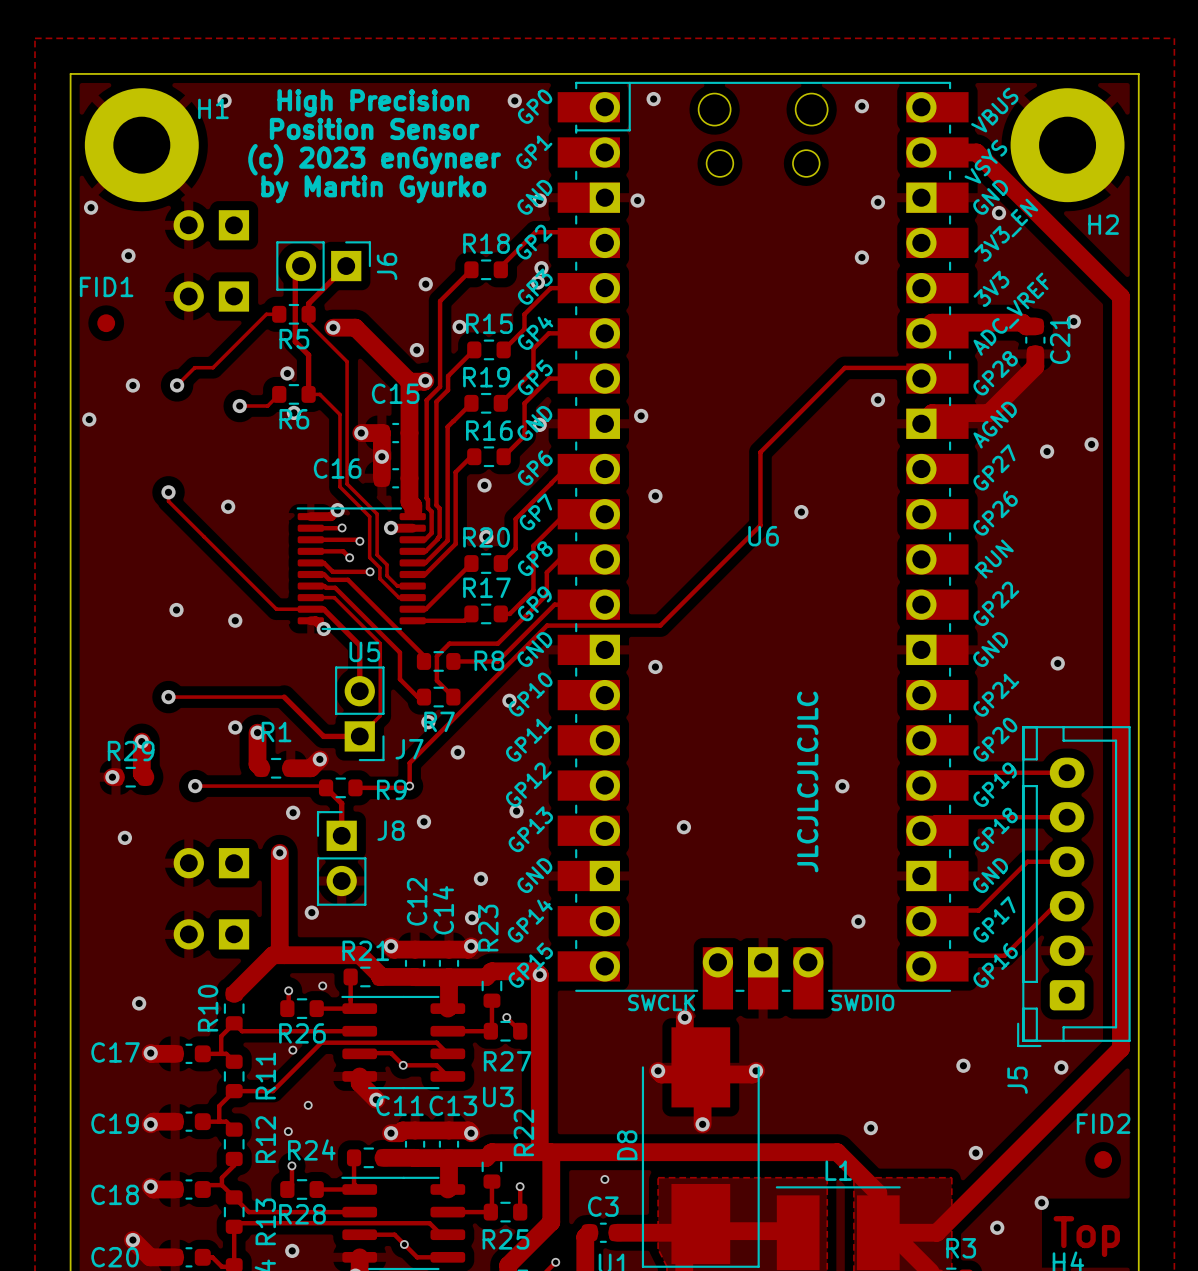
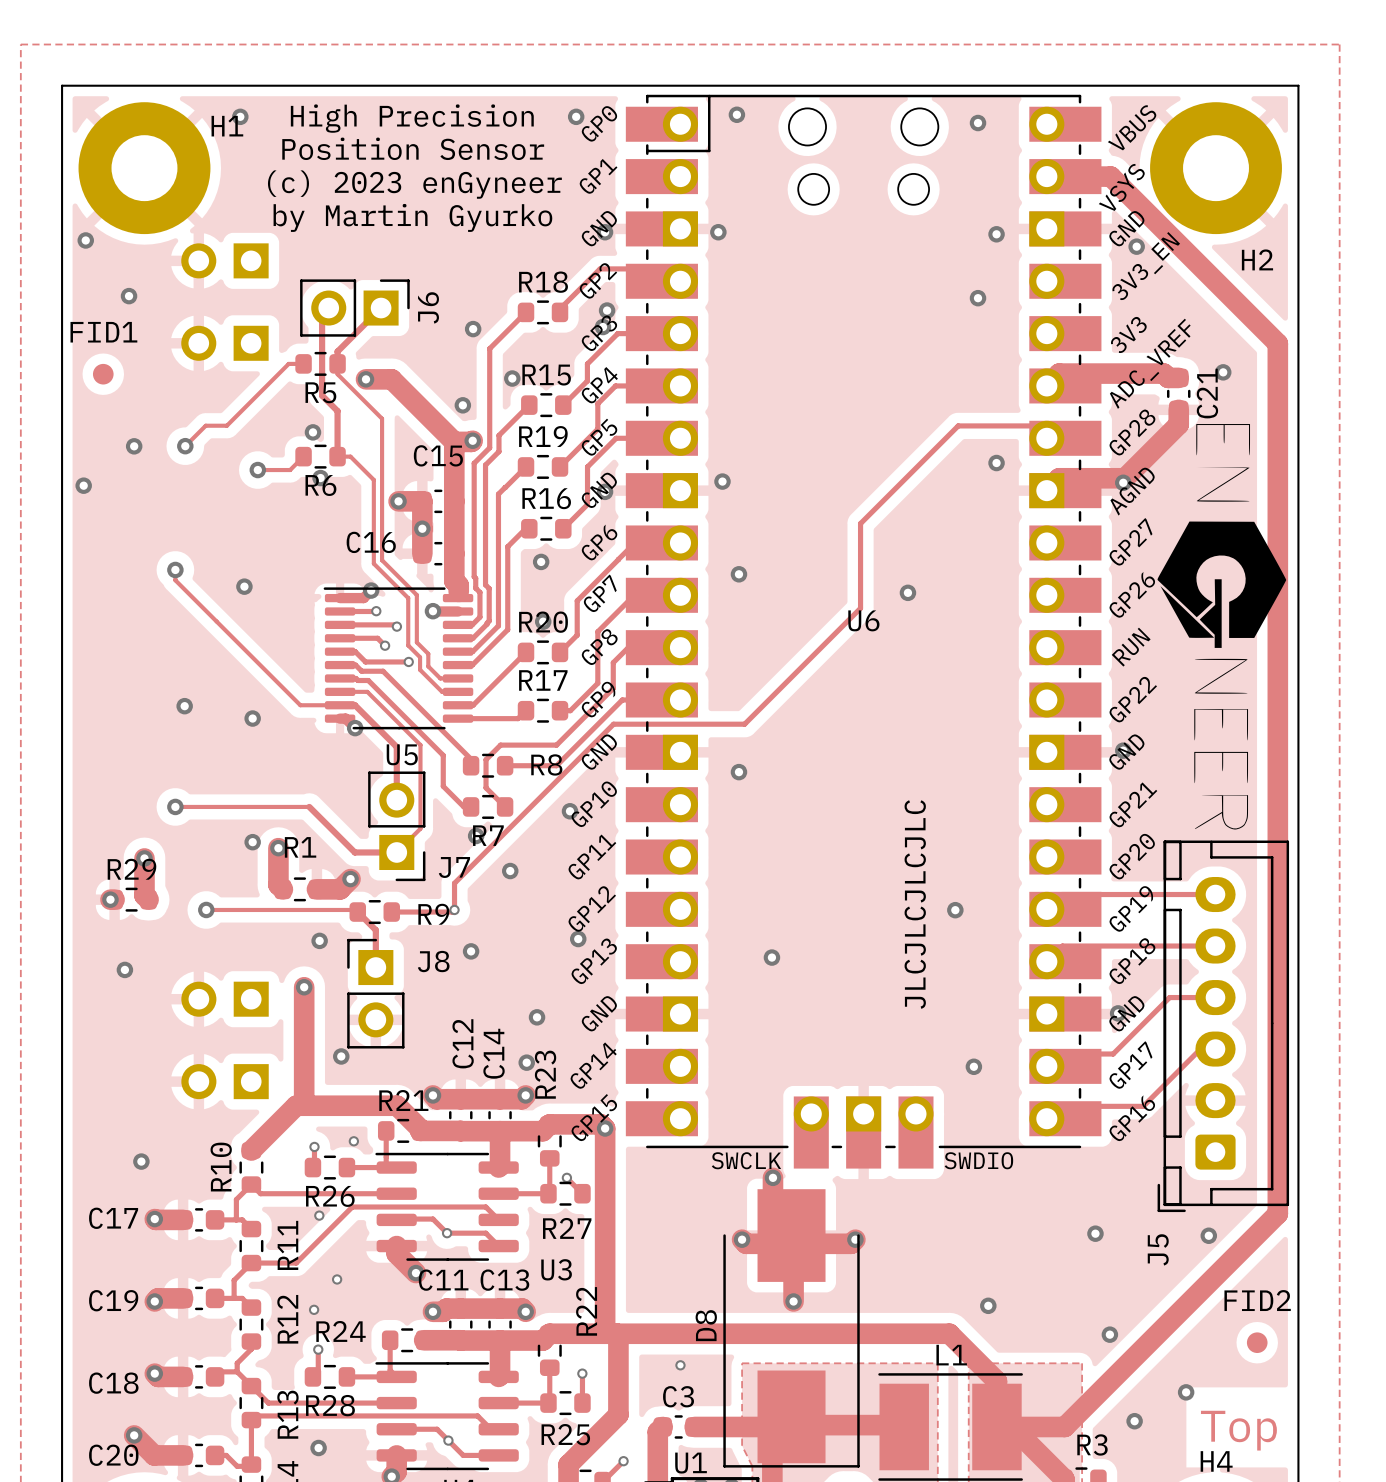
drawing: none -> [1157, 424, 1287, 830]
via: none -> (1123, 482)
via: (1091, 444) -> none
via: (1047, 451) -> none
via position: (1057, 663) -> (1123, 750)
via: none -> (1118, 1013)

